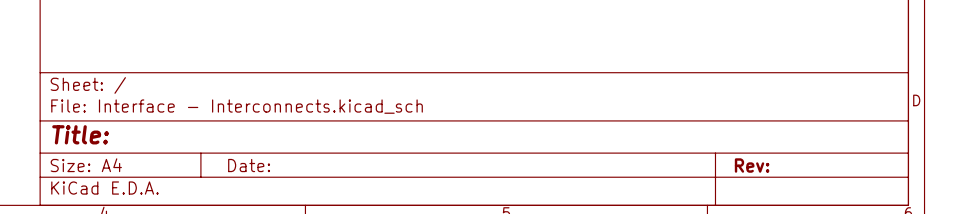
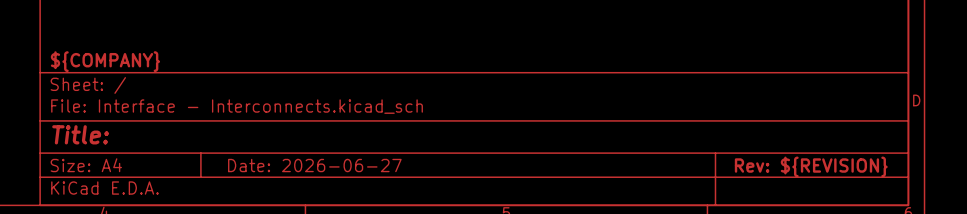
title block: none -> ${COMPANY} (105, 61)
title block: Date: (249, 165) -> Date: 2026-06-27 (314, 165)
title block: Rev: (752, 165) -> Rev: ${REVISION} (811, 166)

